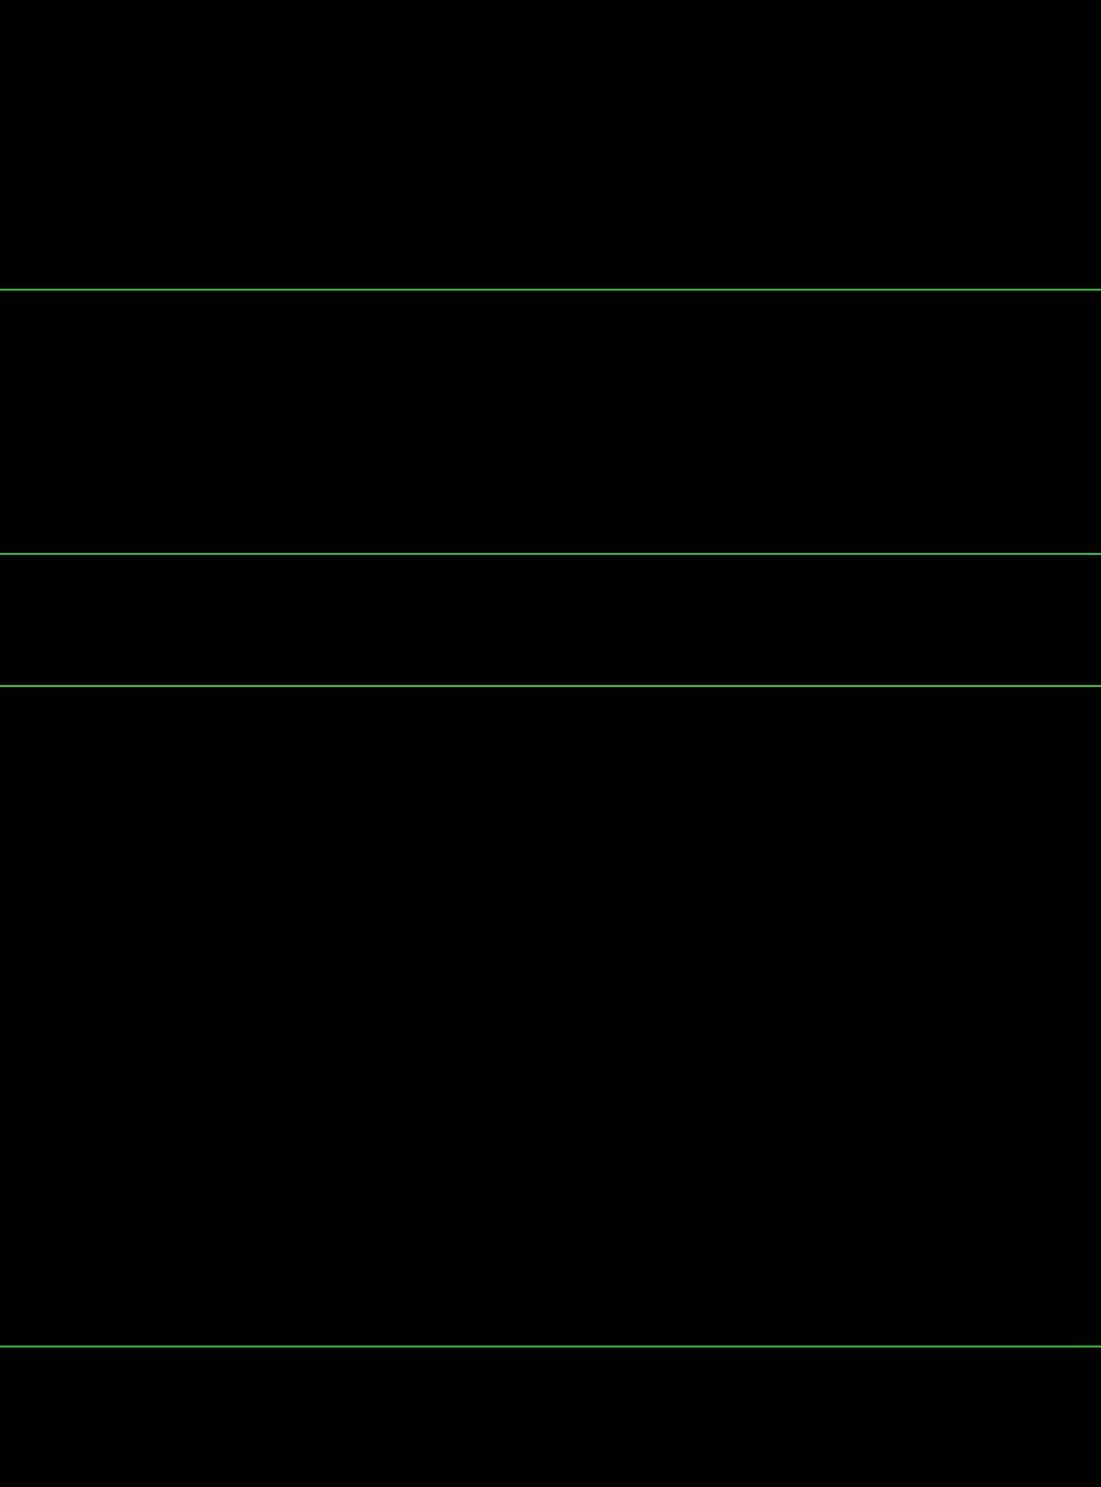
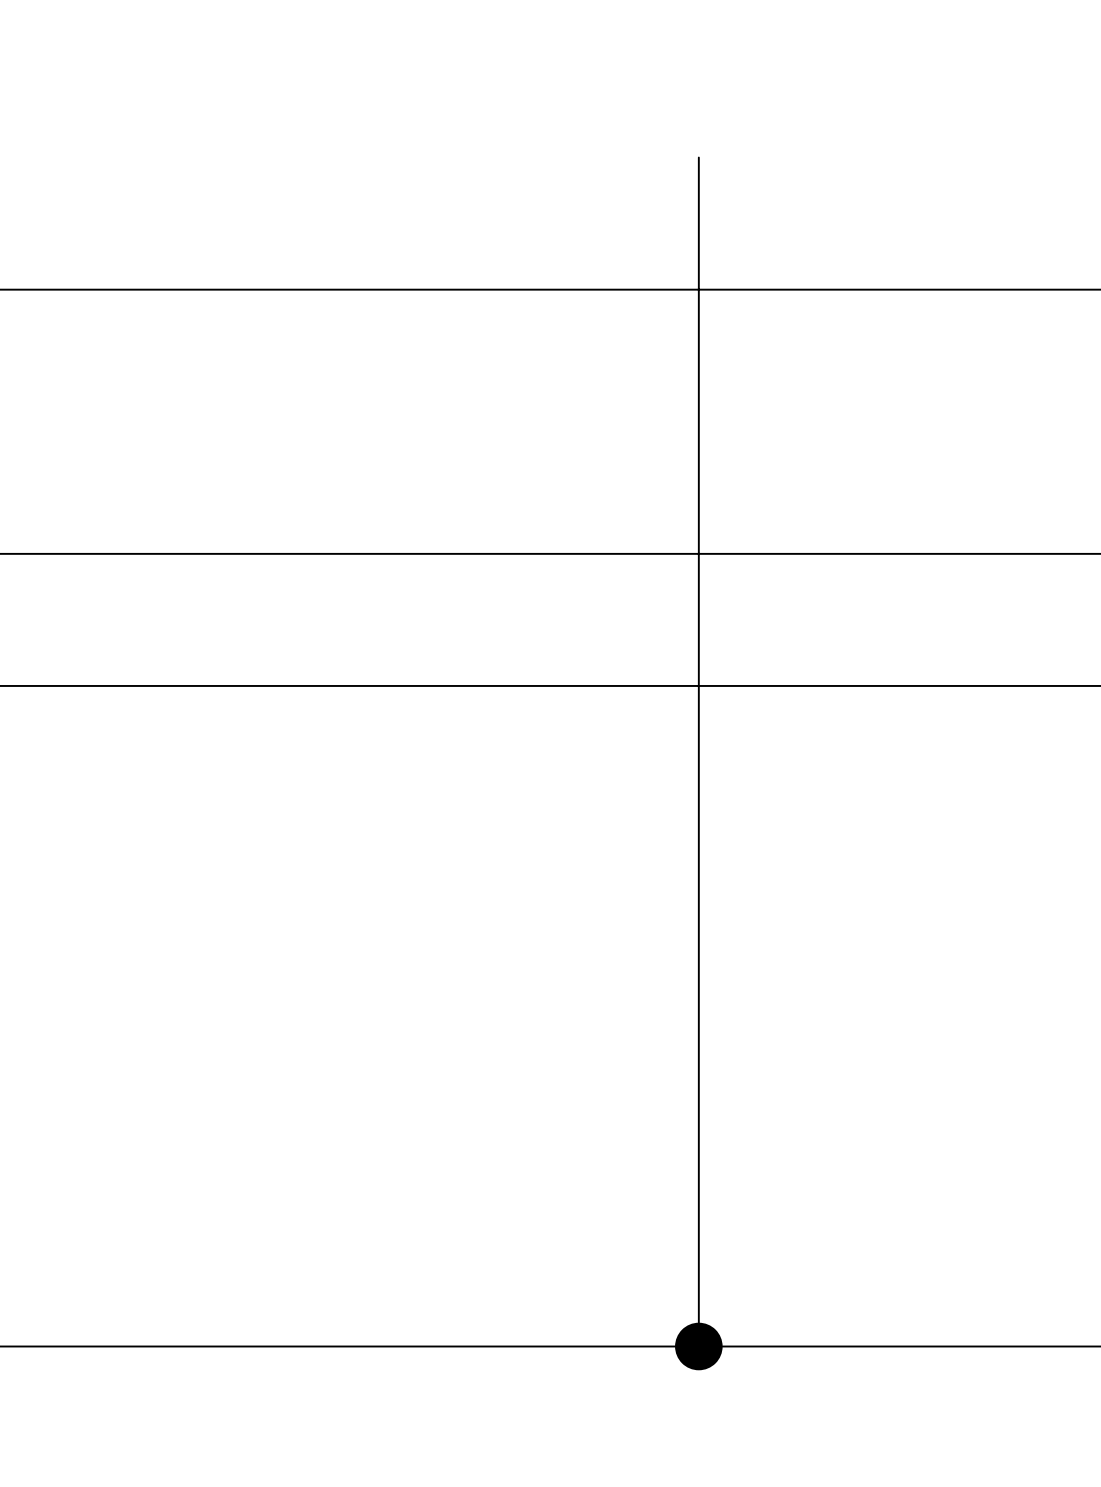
wire: none -> (698, 157) (698, 1346)
junction: none -> (698, 1346)

